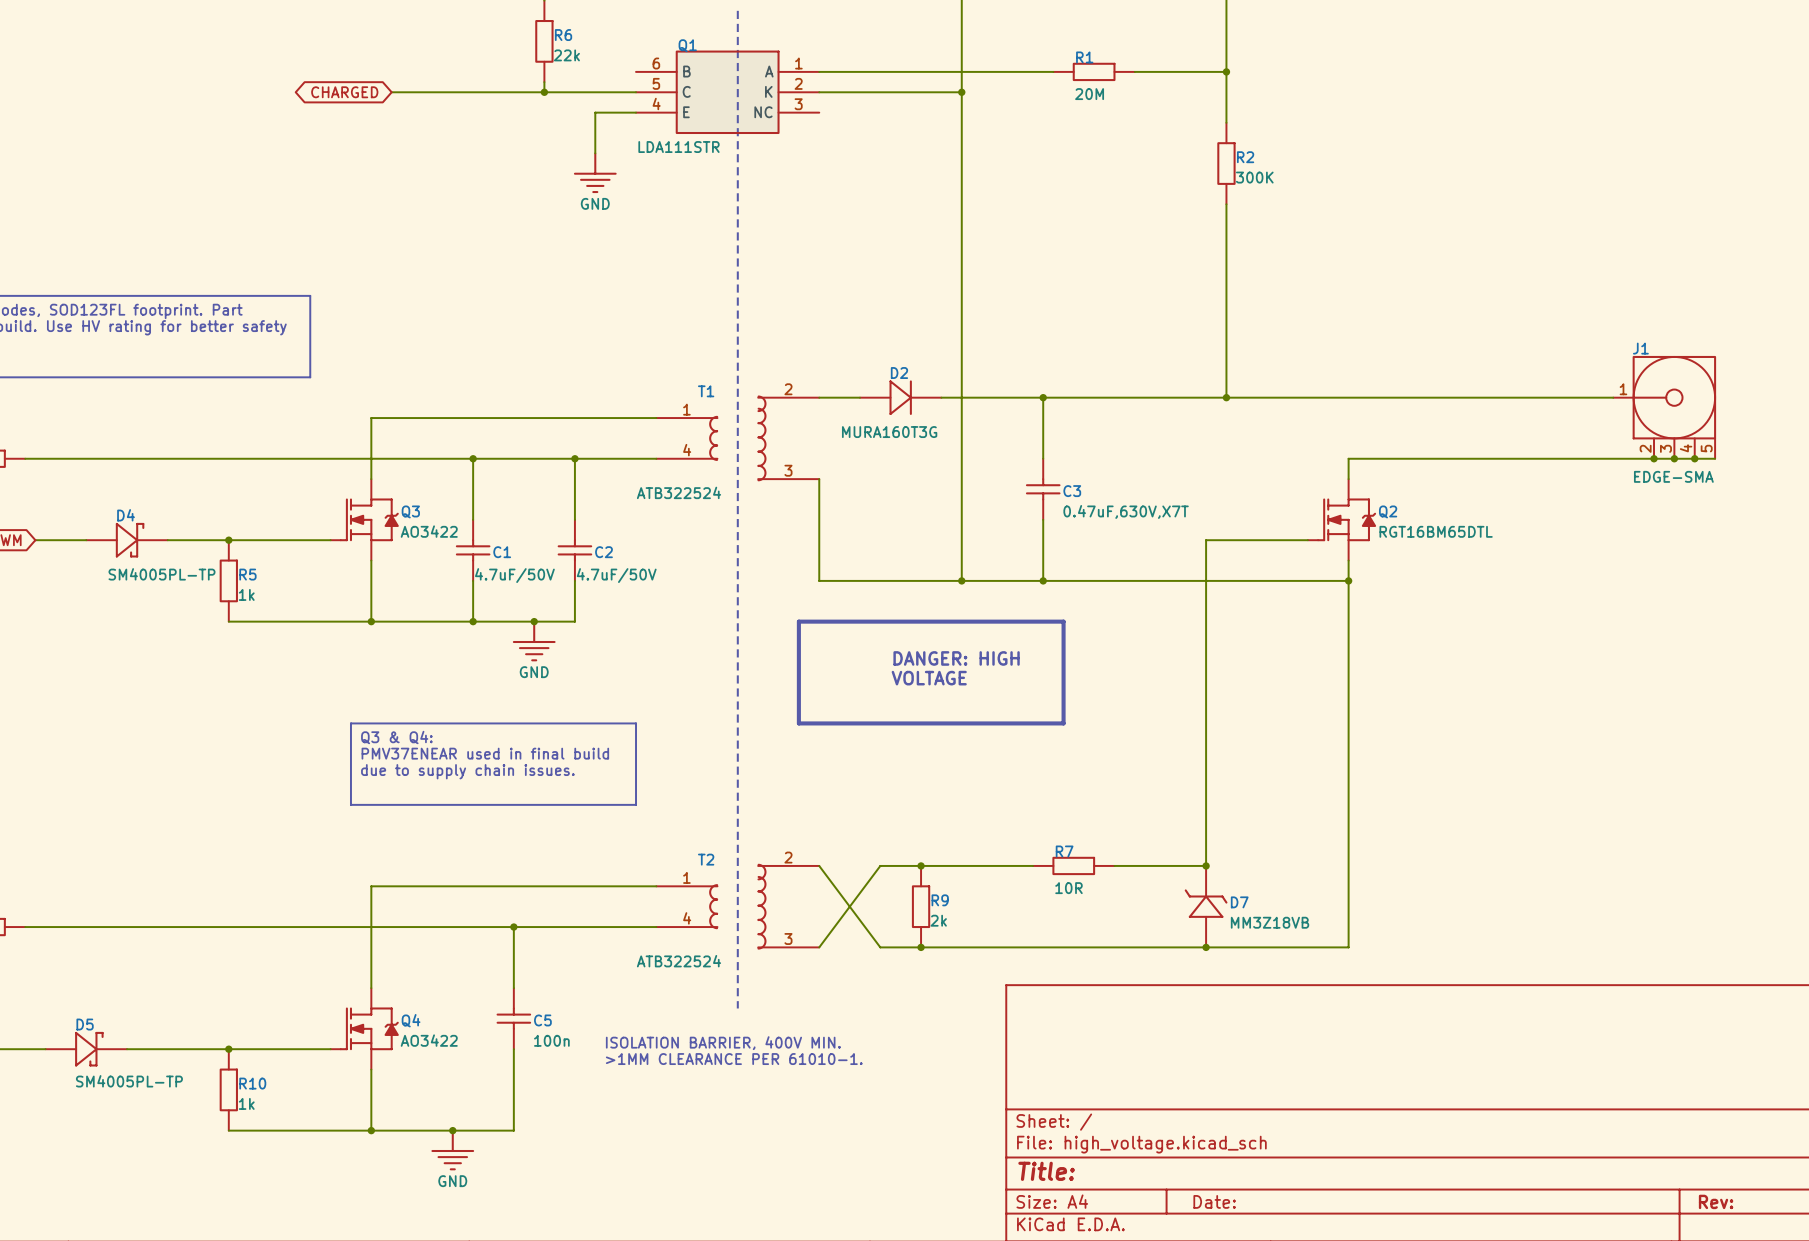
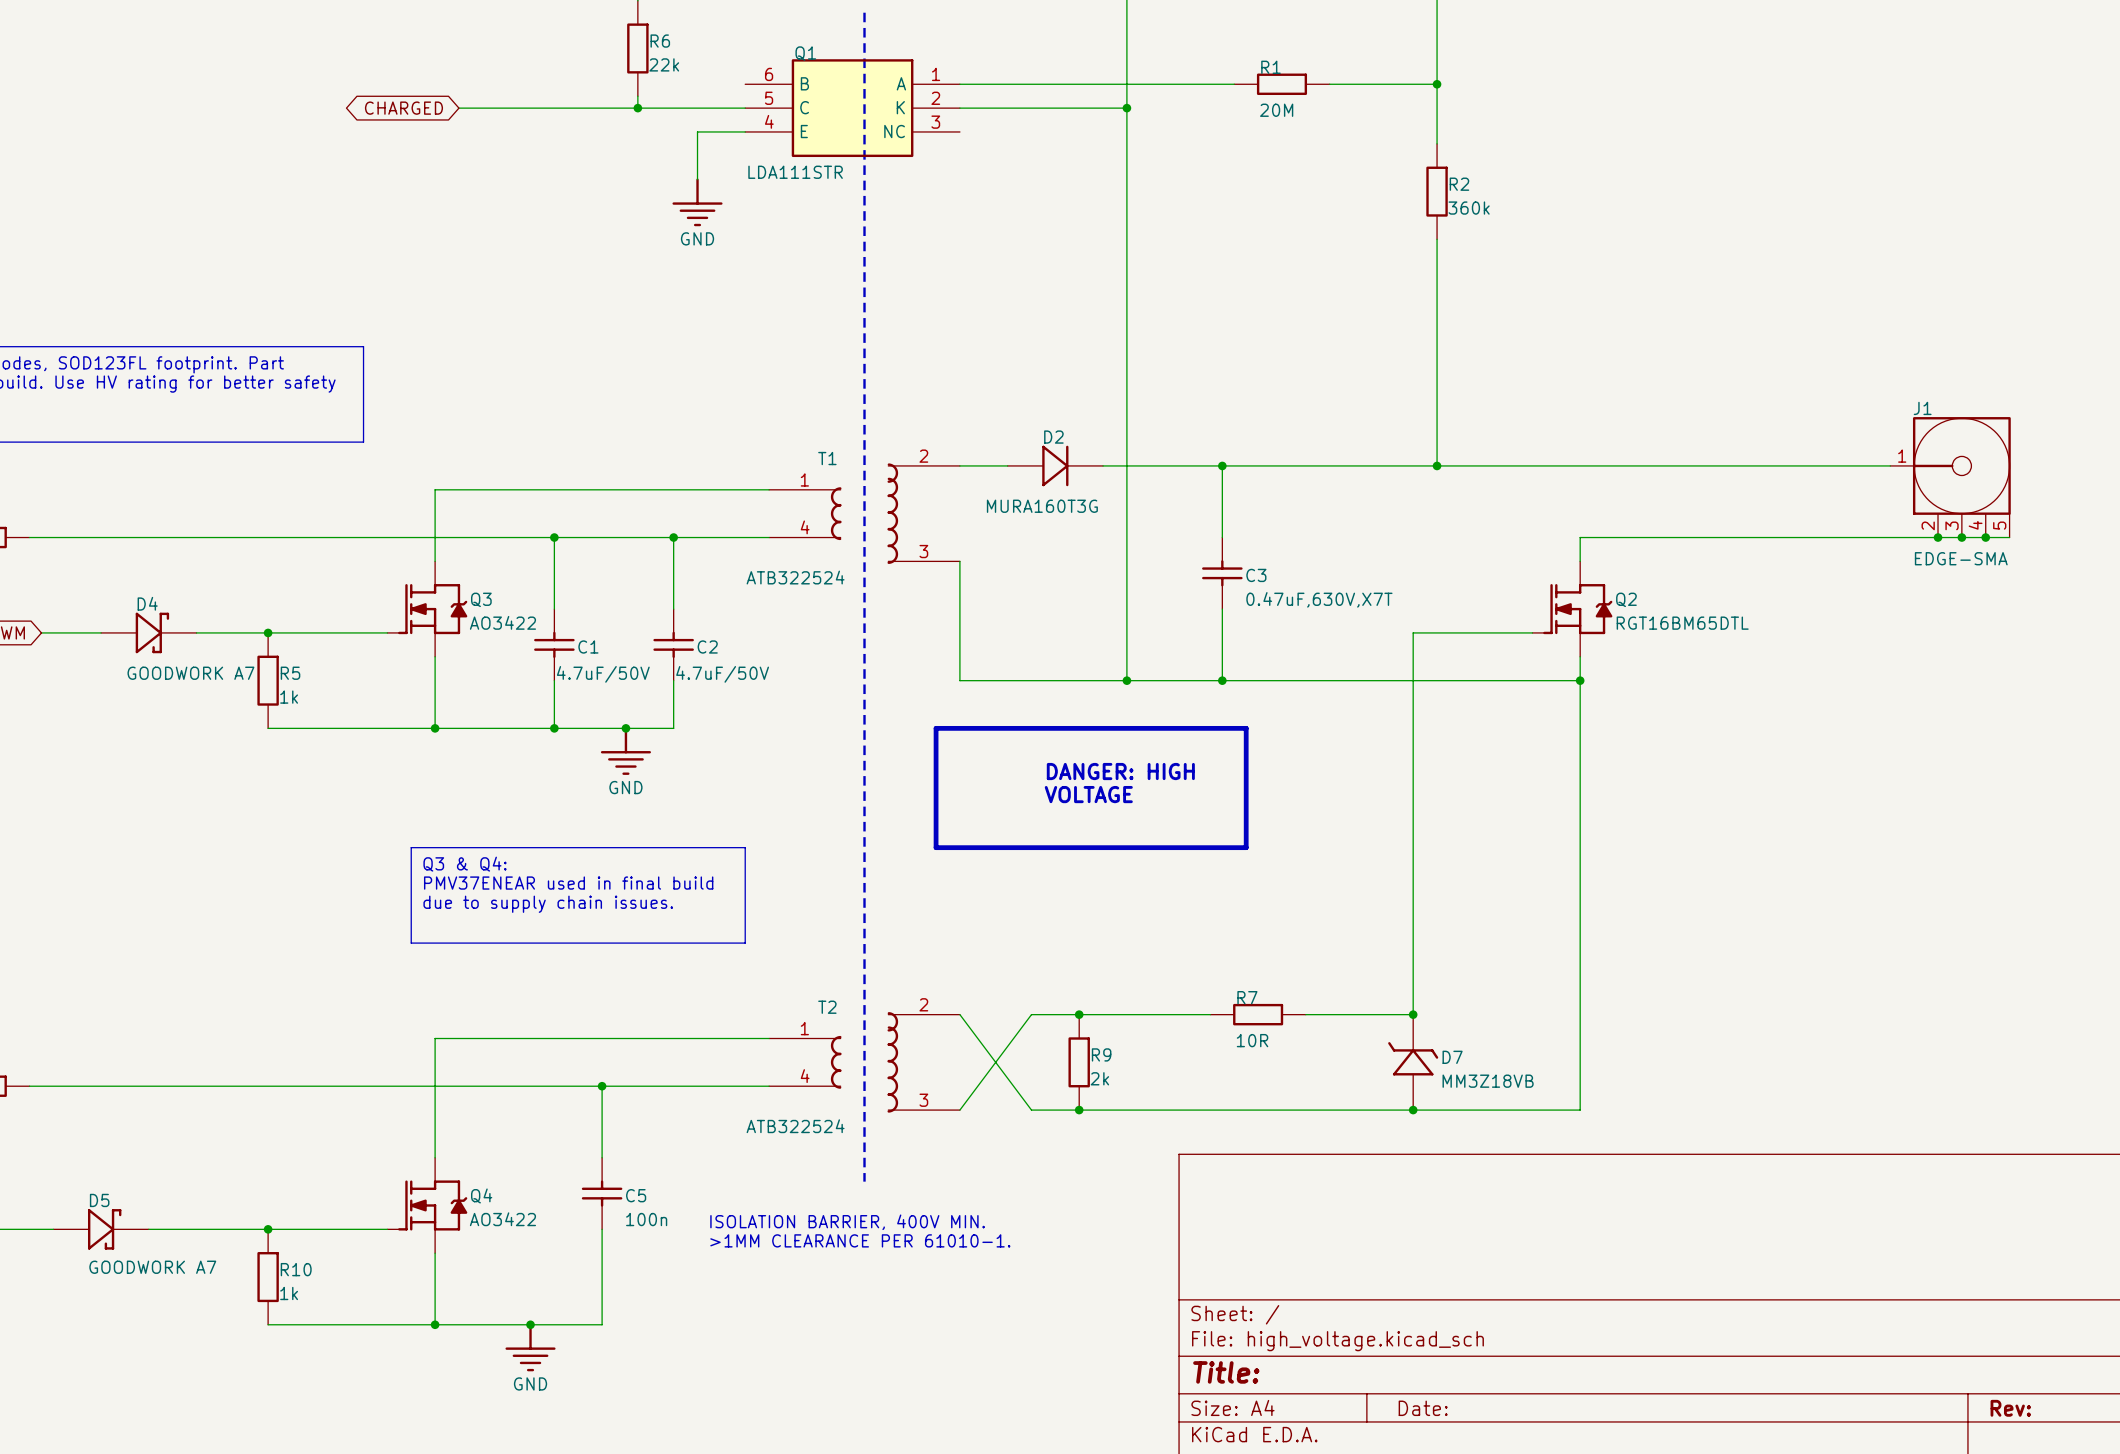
R2 value: 300K (1254, 177) -> 360k (1469, 208)
D4 value: SM4005PL-TP (161, 574) -> GOODWORK A7 (190, 673)
D5 value: SM4005PL-TP (129, 1081) -> GOODWORK A7 (152, 1267)

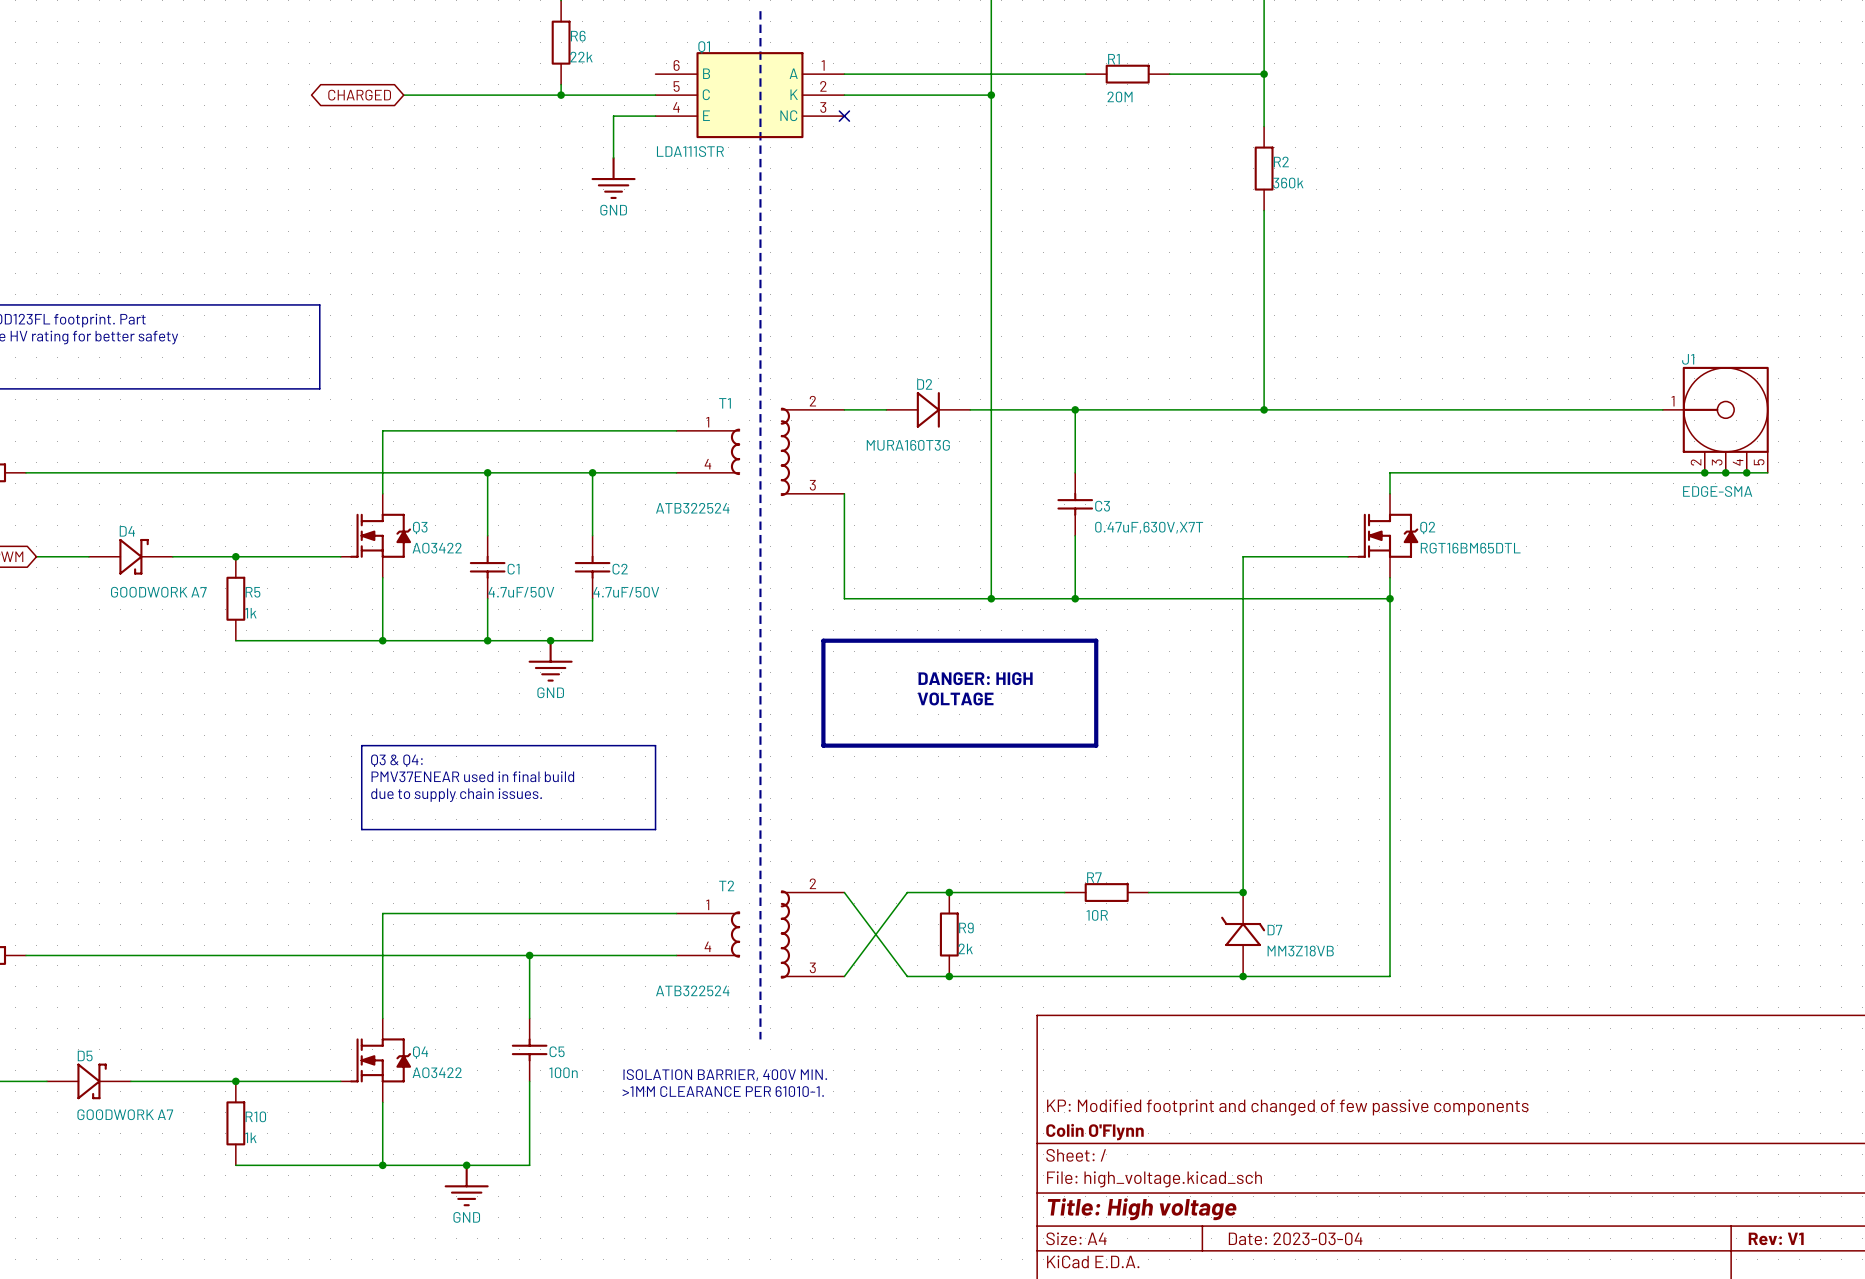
no-connect mark: none -> (844, 116)
title block: none -> KP: Modified footprint and changed of few passive components (1287, 1107)
title block: none -> Colin O'Flynn (1094, 1132)
title block: Title: (1226, 1372) -> Title: High voltage (1142, 1209)
title block: Date: (1423, 1408) -> Date: 2023-03-04 (1295, 1238)
title block: Rev: (2010, 1408) -> Rev: V1 (1776, 1238)

